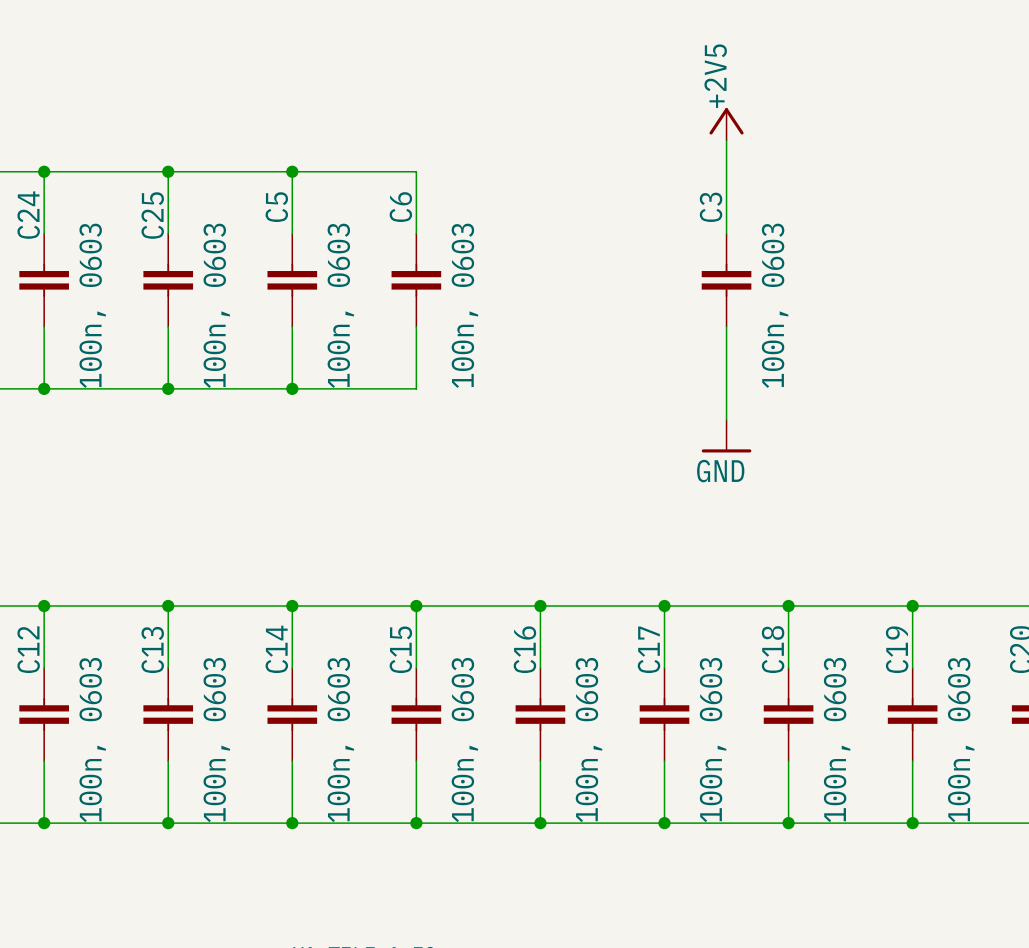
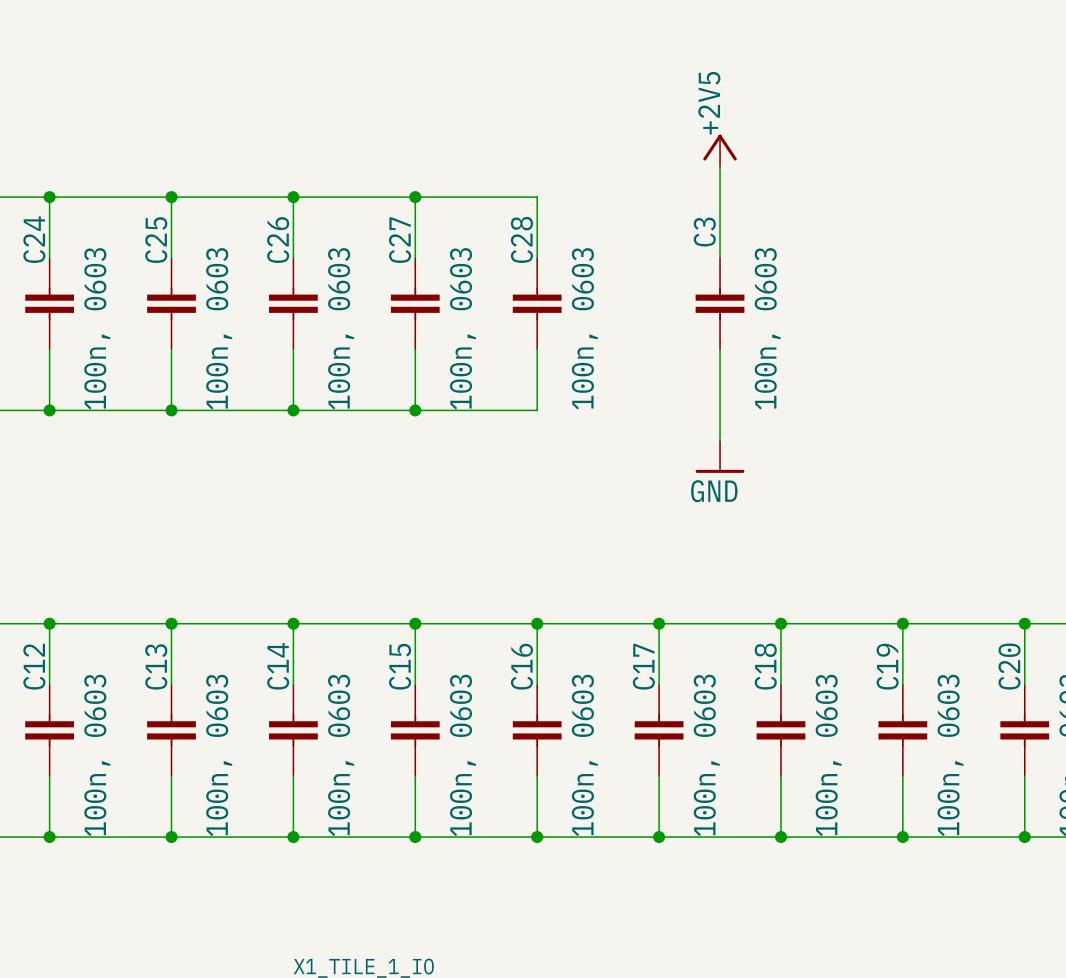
wire: none -> (415, 197) (537, 197) (537, 258)
junction: none -> (415, 197)
C5 name: C5 (276, 207) -> C26 (278, 240)
C6 name: C6 (400, 207) -> C27 (400, 240)
C28: none -> 100n, 0603 (537, 303)
wire: none -> (537, 349) (537, 410) (415, 410)
junction: none -> (415, 410)

